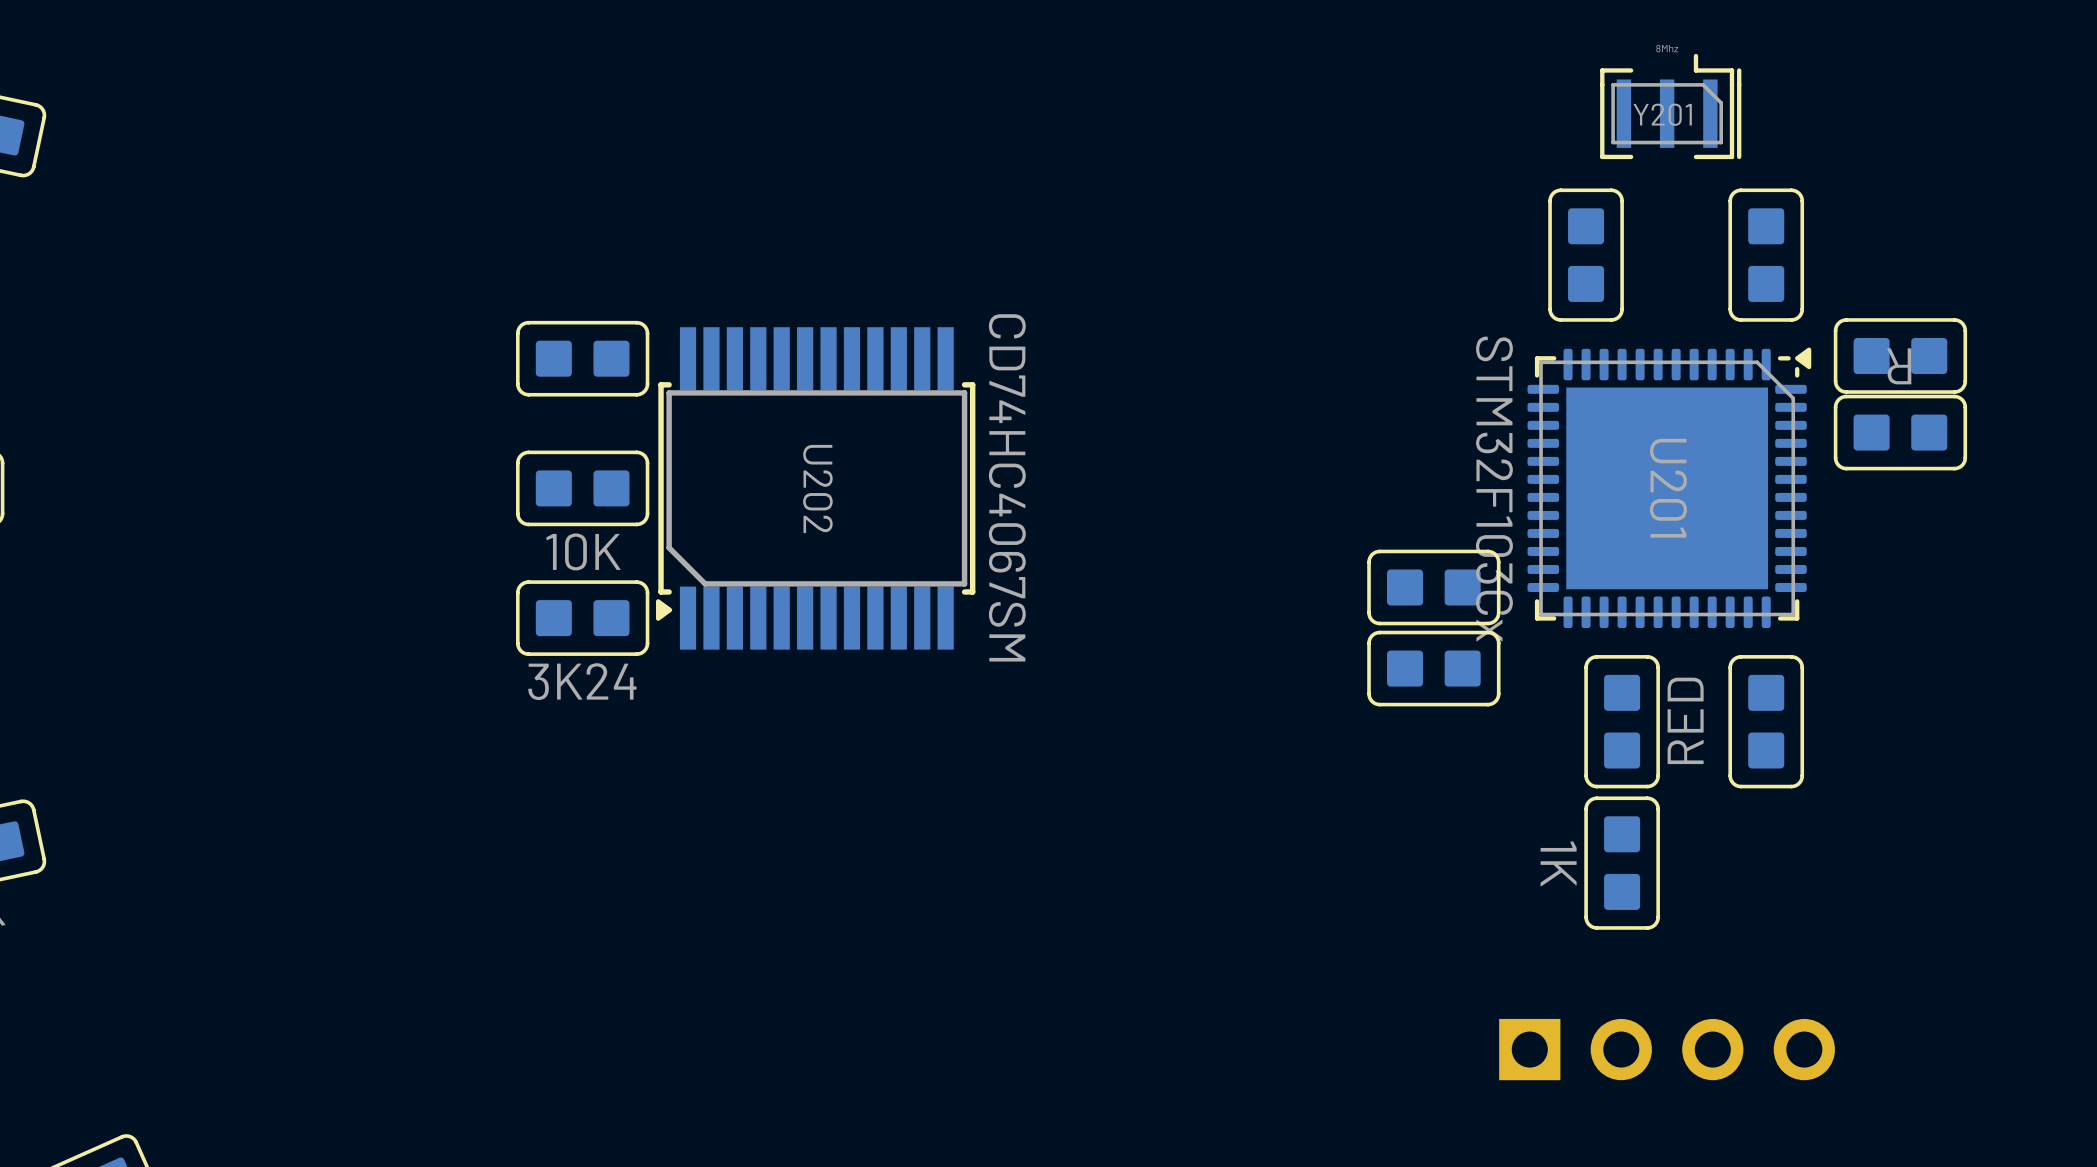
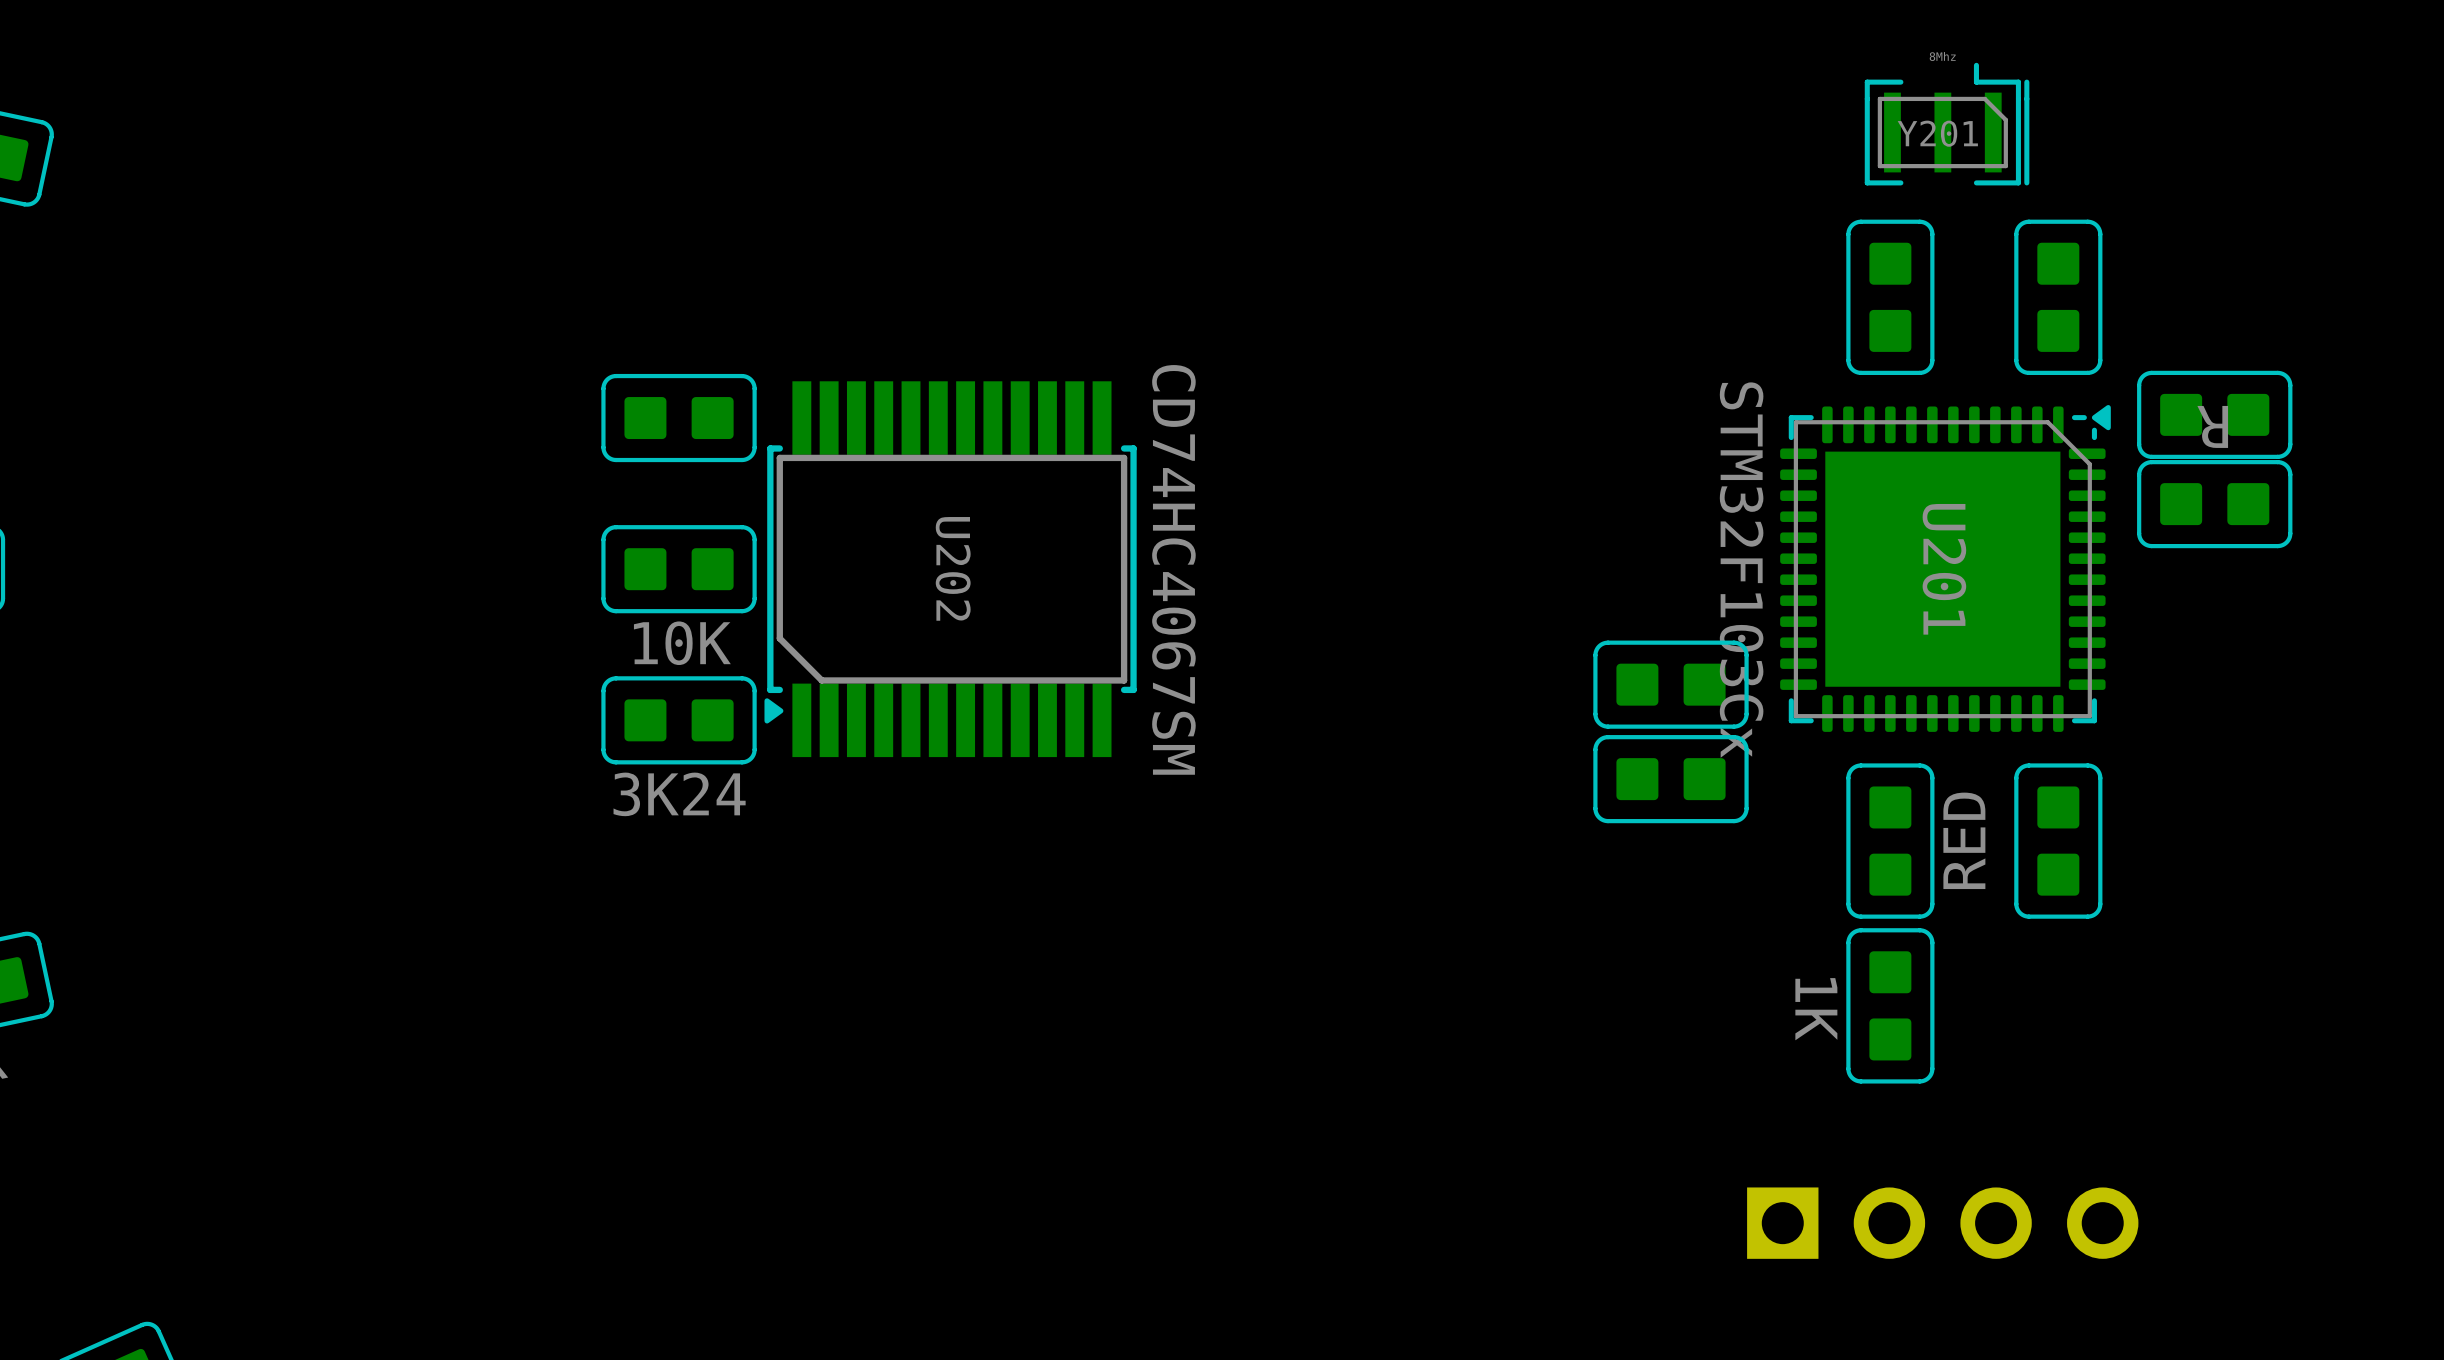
part position: (1586, 255) -> (1890, 297)

